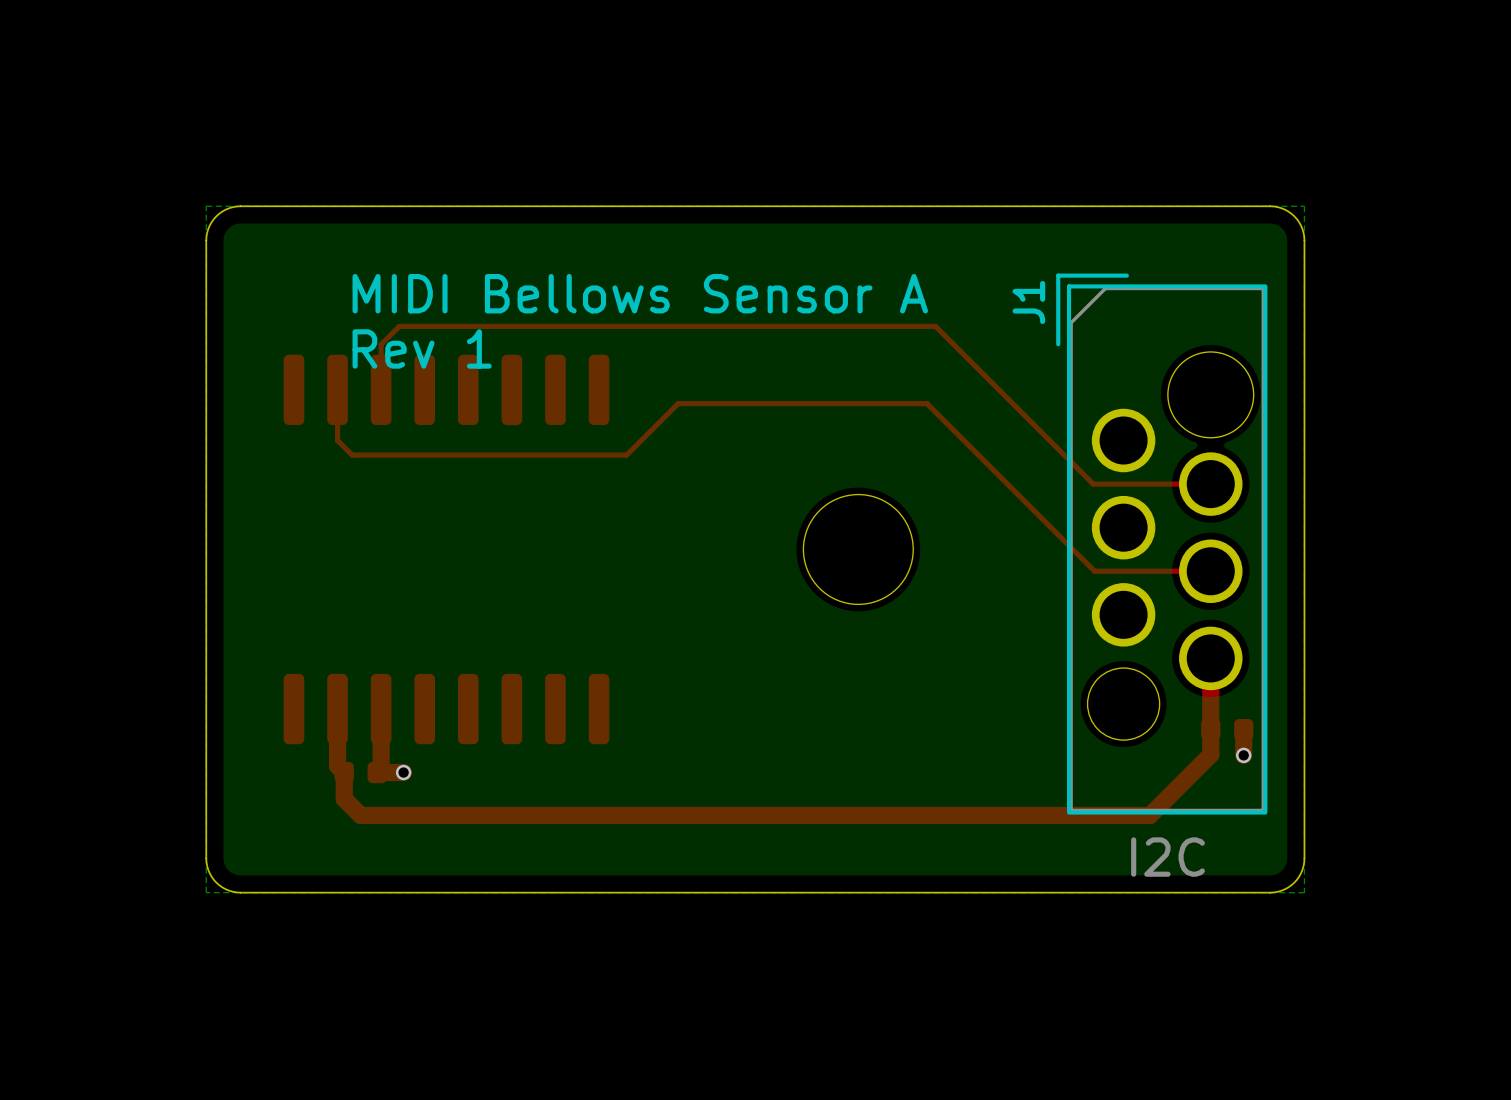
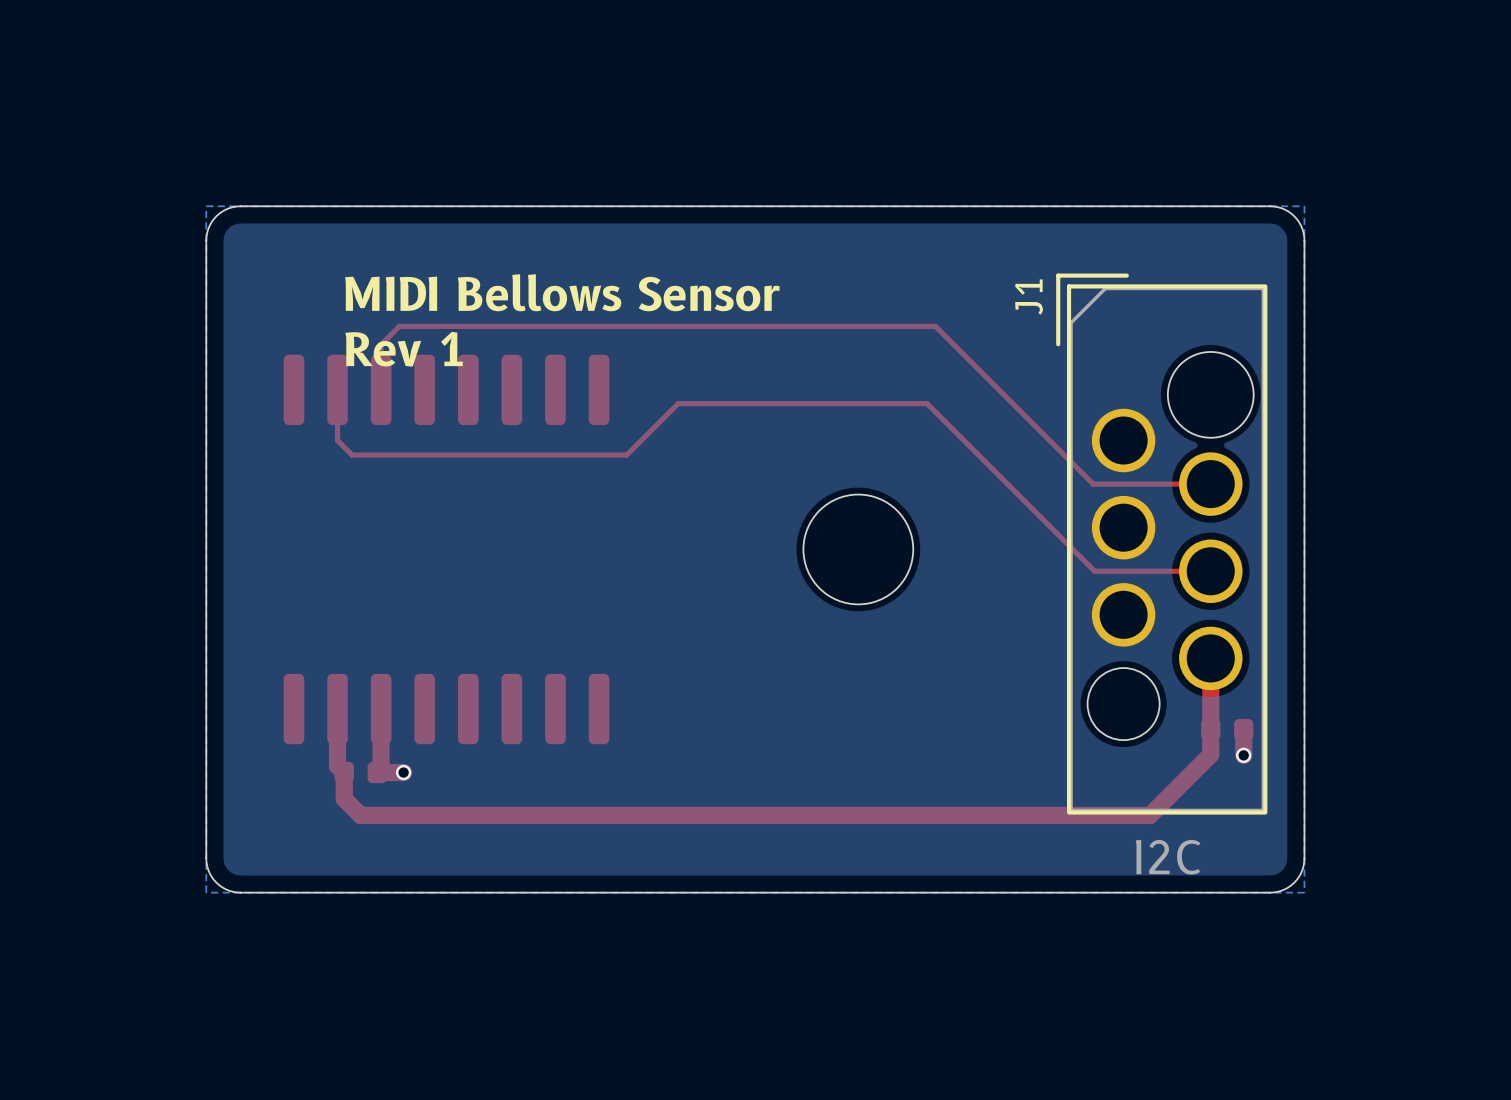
text: MIDI Bellows Sensor A (640, 293) -> MIDI Bellows Sensor (562, 292)

